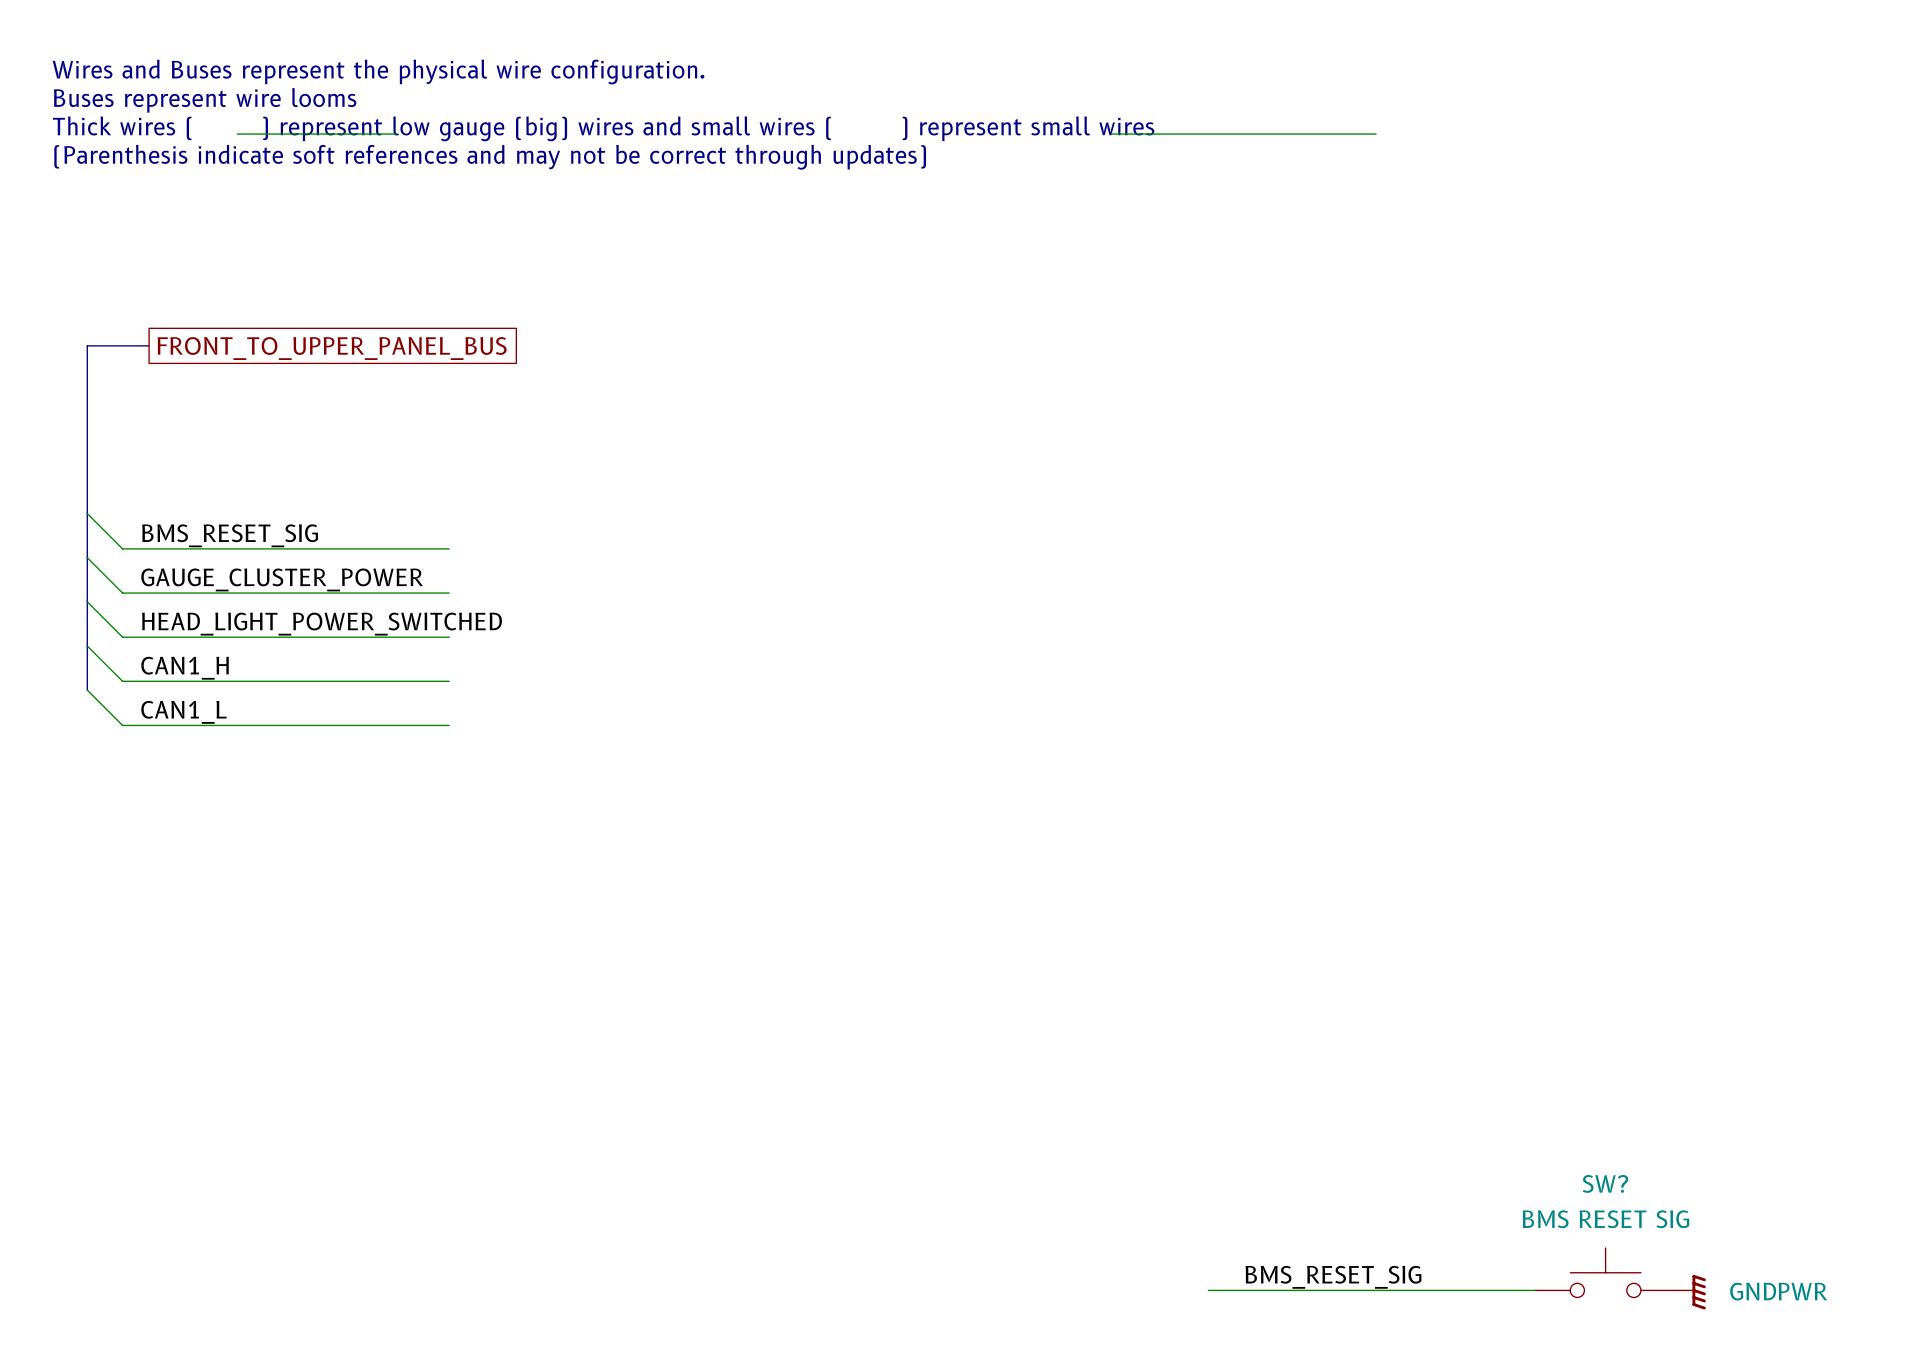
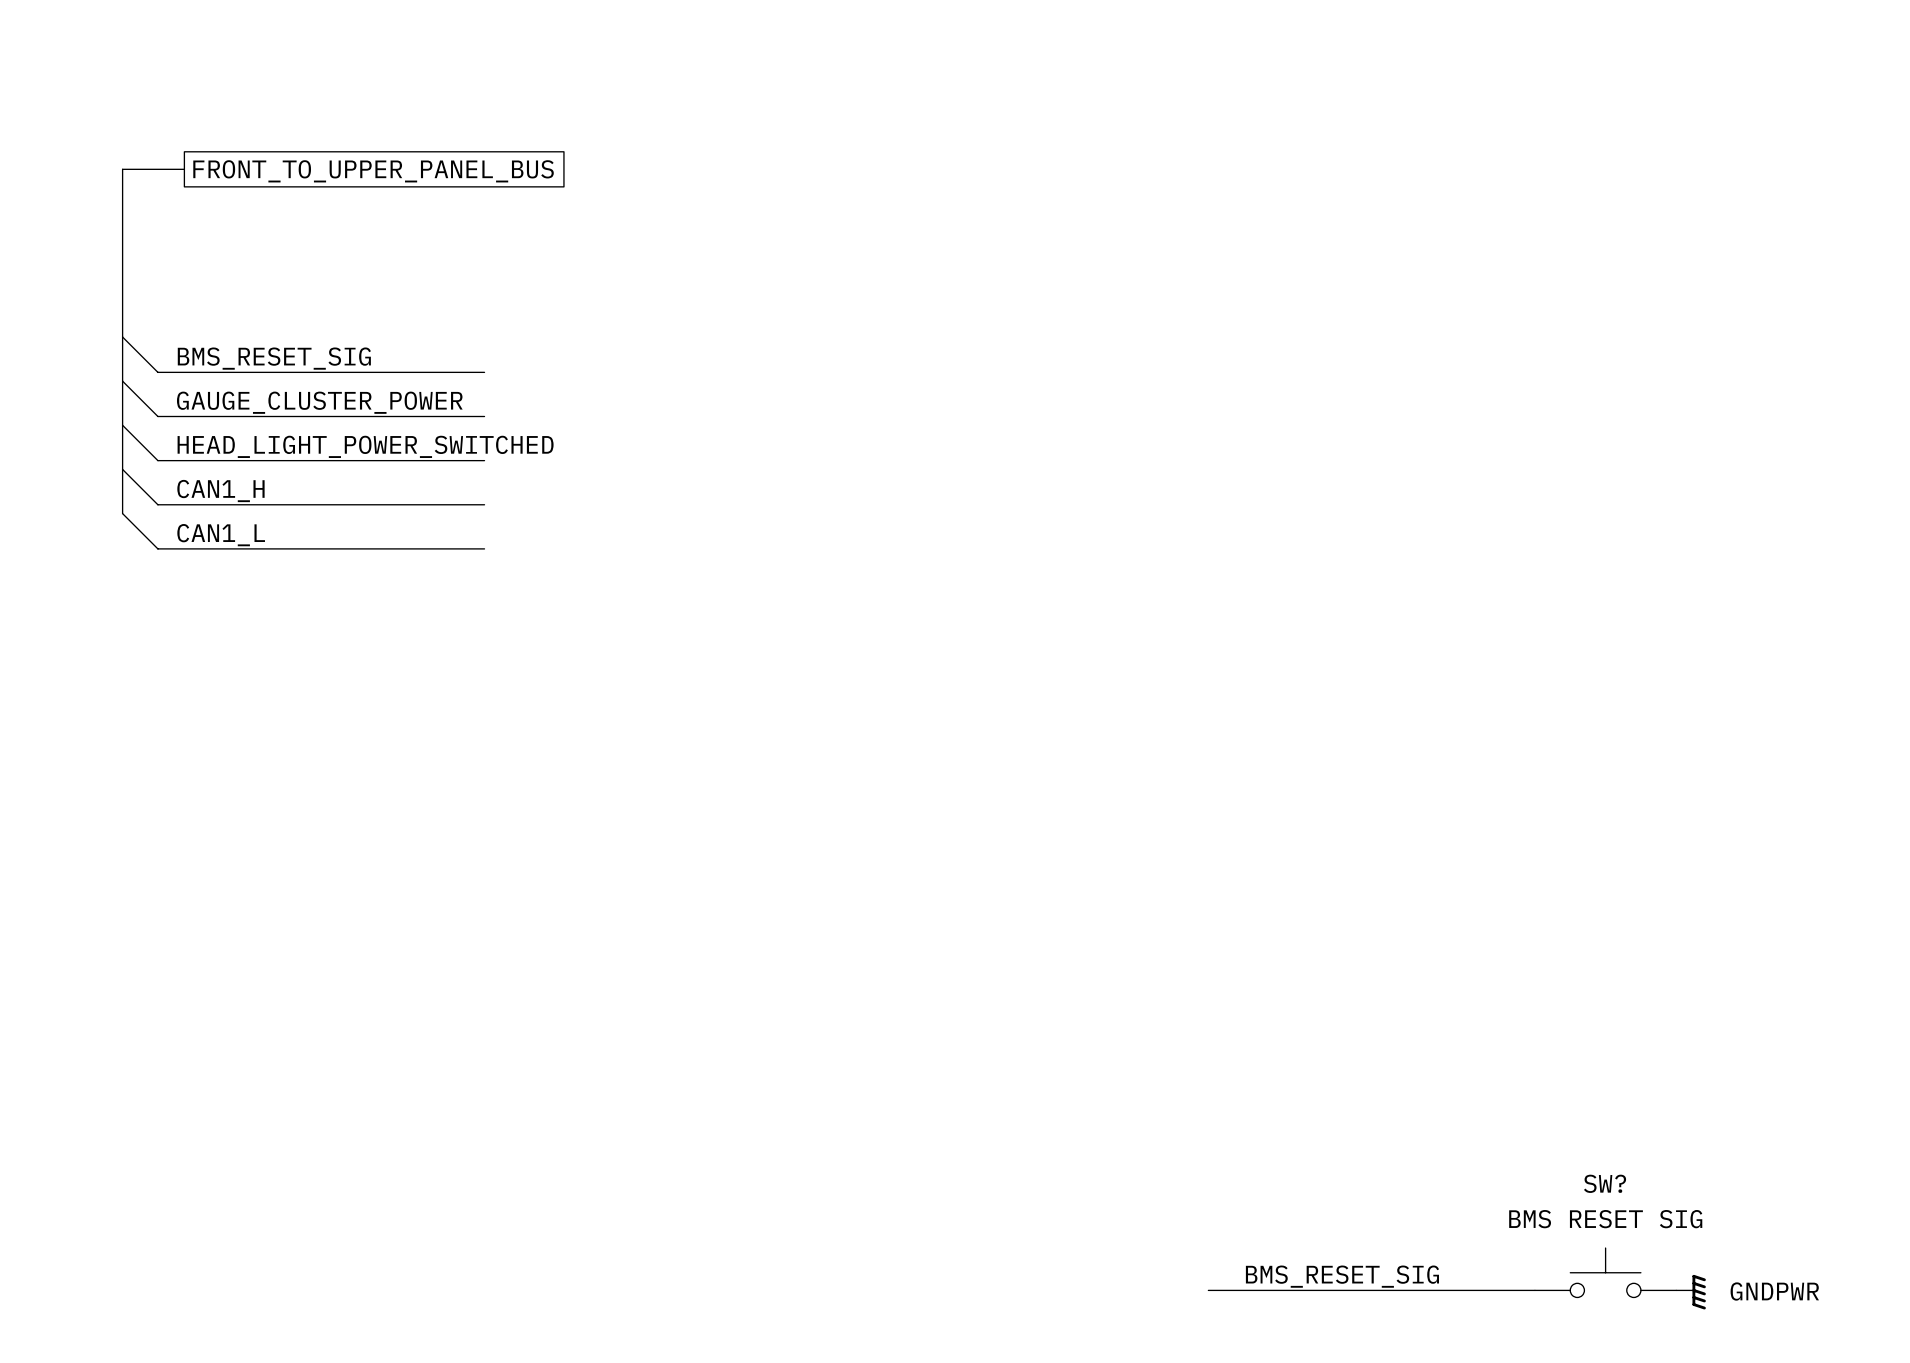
text: Wires and Buses represent the physical wire configuration. (378, 72) -> none
text: Buses represent wire looms (205, 100) -> none
text: Thick wires ( ) represent low gauge (big) wires and small wires ( ) represent small wires (603, 128) -> none
wire: (237, 134) (396, 134) -> none
wire: (1111, 134) (1376, 134) -> none
text: (Parenthesis indicate soft references and may not be correct through updates) (490, 157) -> none
wire: none -> (122, 337) (157, 372) (484, 372)
bus: (149, 345) (87, 345) (87, 690) -> (184, 169) (122, 169) (122, 513)
global label position: FRONT_TO_UPPER_PANEL_BUS (332, 348) -> FRONT_TO_UPPER_PANEL_BUS (373, 171)
wire: (87, 513) (122, 548) (157, 548) -> (122, 513) (157, 548)
label position: BMS_RESET_SIG (230, 535) -> BMS_RESET_SIG (274, 358)
wire: none -> (449, 548) (484, 548)
wire: (87, 557) (122, 593) (449, 593) -> (122, 381) (157, 416) (484, 416)
label position: GAUGE_CLUSTER_POWER (282, 579) -> GAUGE_CLUSTER_POWER (319, 402)
wire: (87, 601) (122, 637) (449, 637) -> (122, 425) (157, 460) (484, 460)
label position: HEAD_LIGHT_POWER_SWITCHED (321, 624) -> HEAD_LIGHT_POWER_SWITCHED (365, 446)
wire: (87, 646) (122, 681) (449, 681) -> (122, 469) (157, 504) (484, 504)
label position: CAN1_H (185, 668) -> CAN1_H (220, 491)
wire: (87, 690) (122, 725) -> none
label position: CAN1_L (183, 712) -> CAN1_L (221, 535)
wire: (122, 725) (449, 725) -> none

